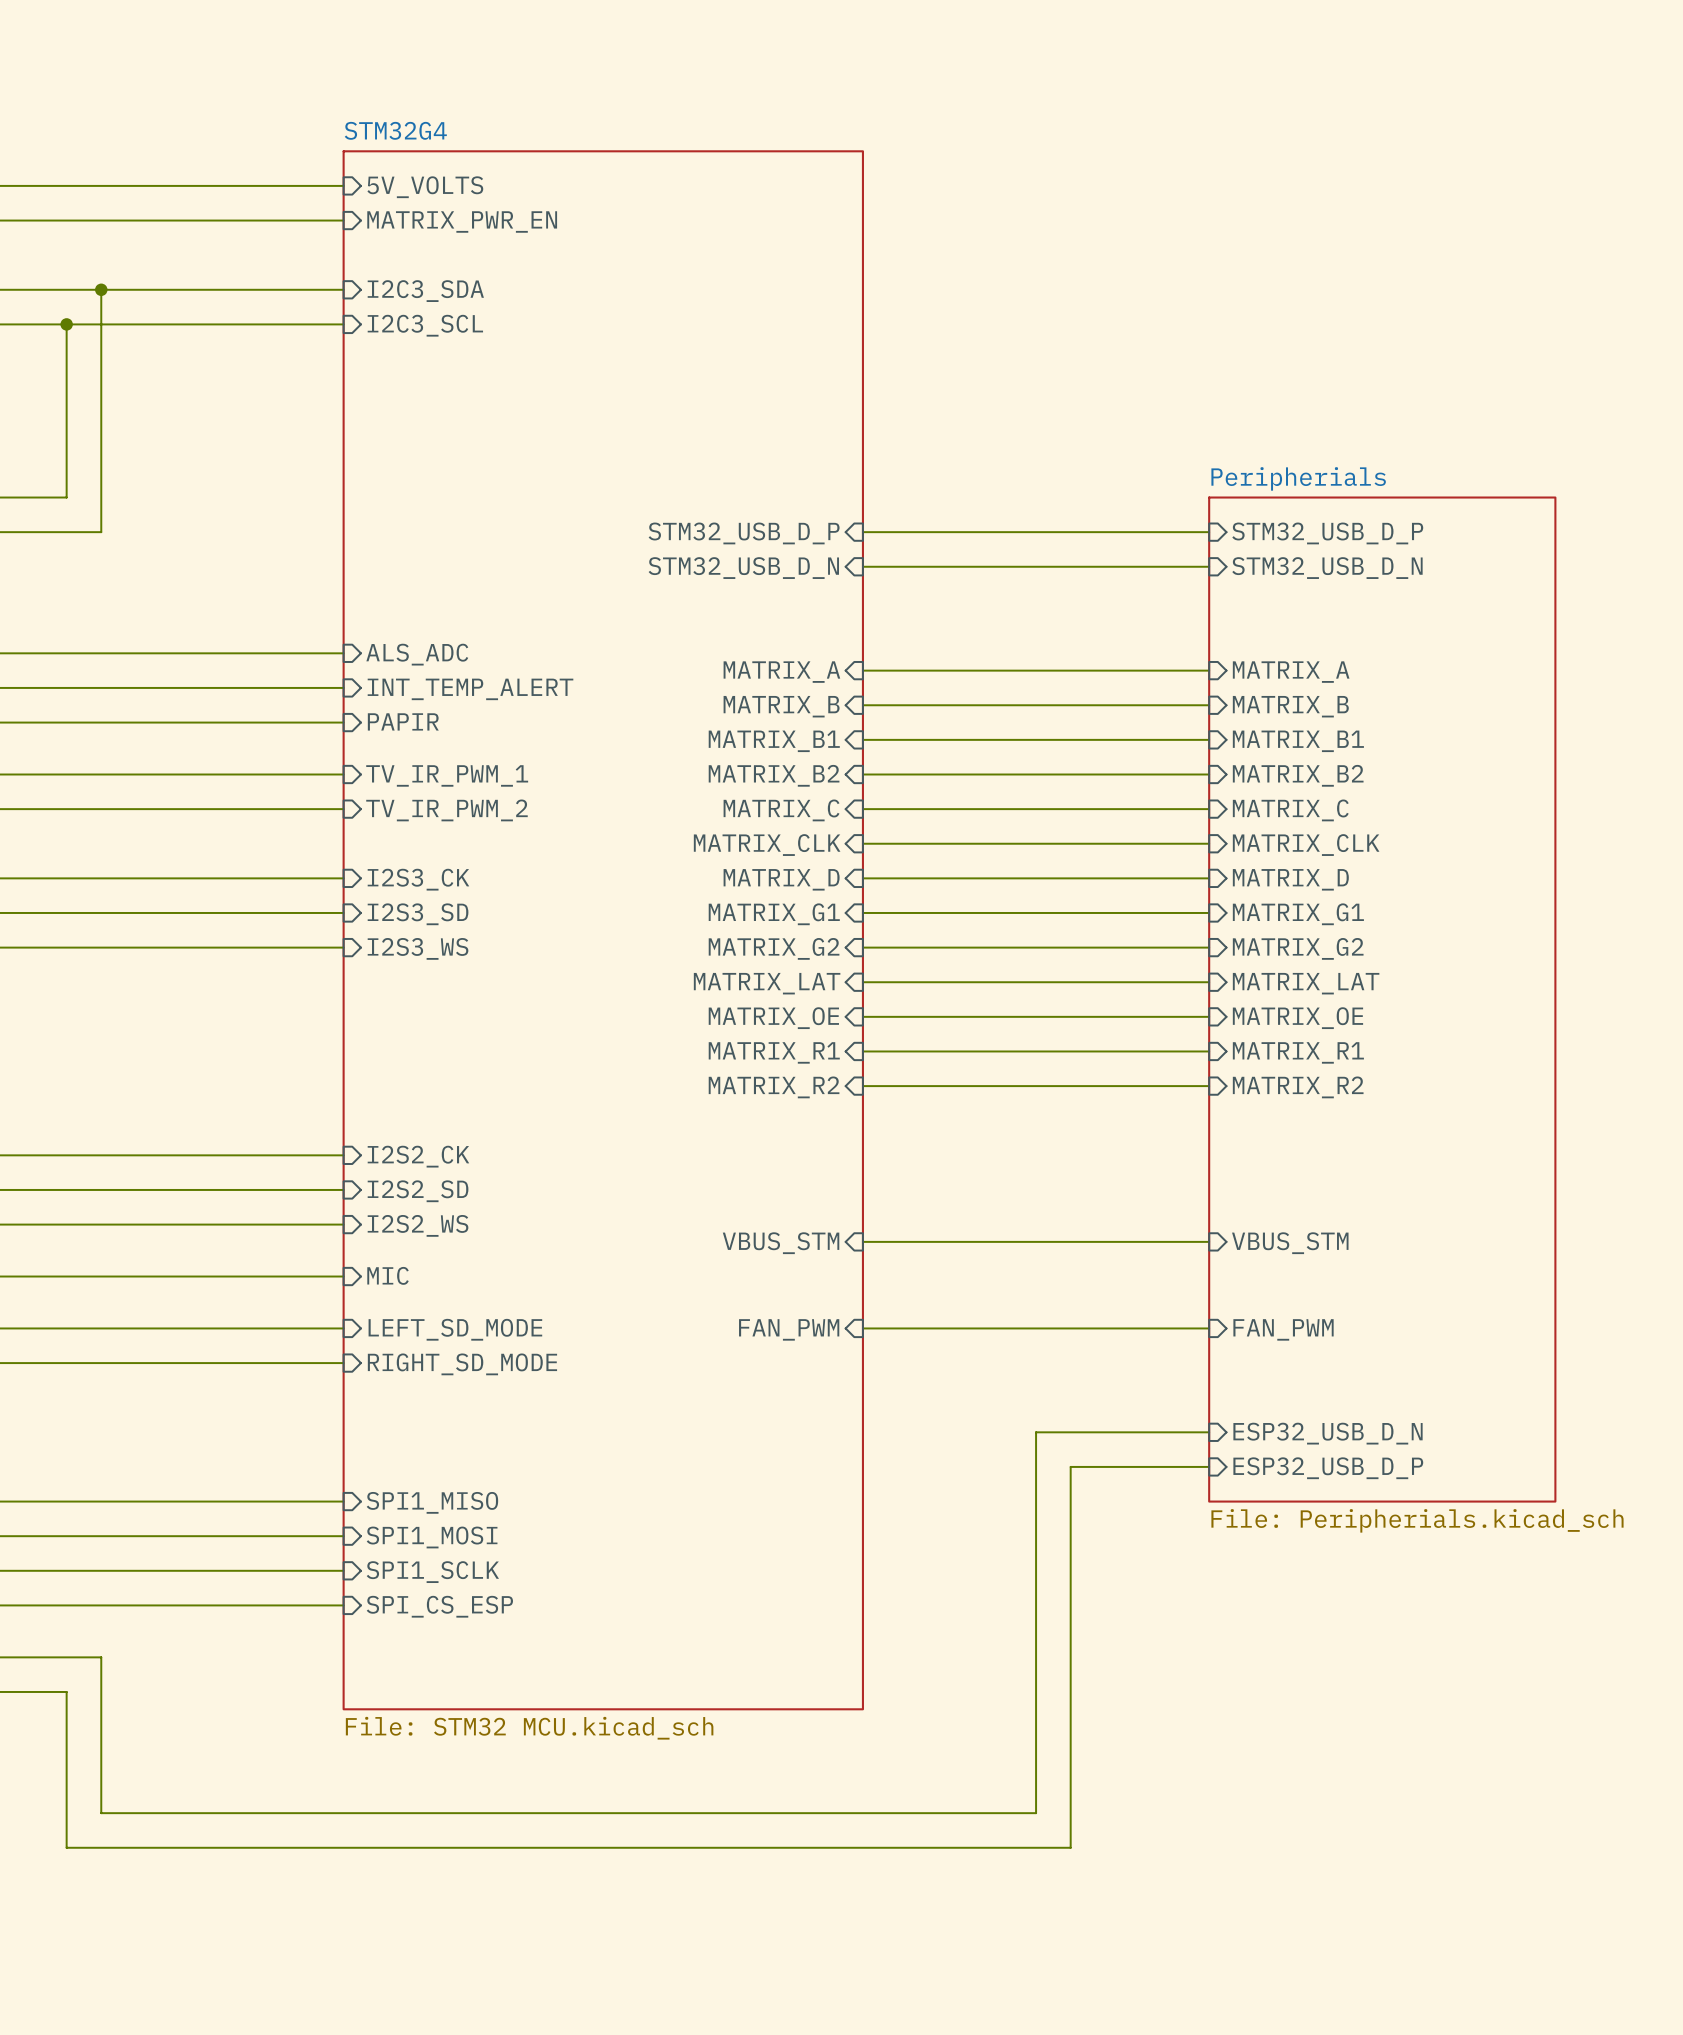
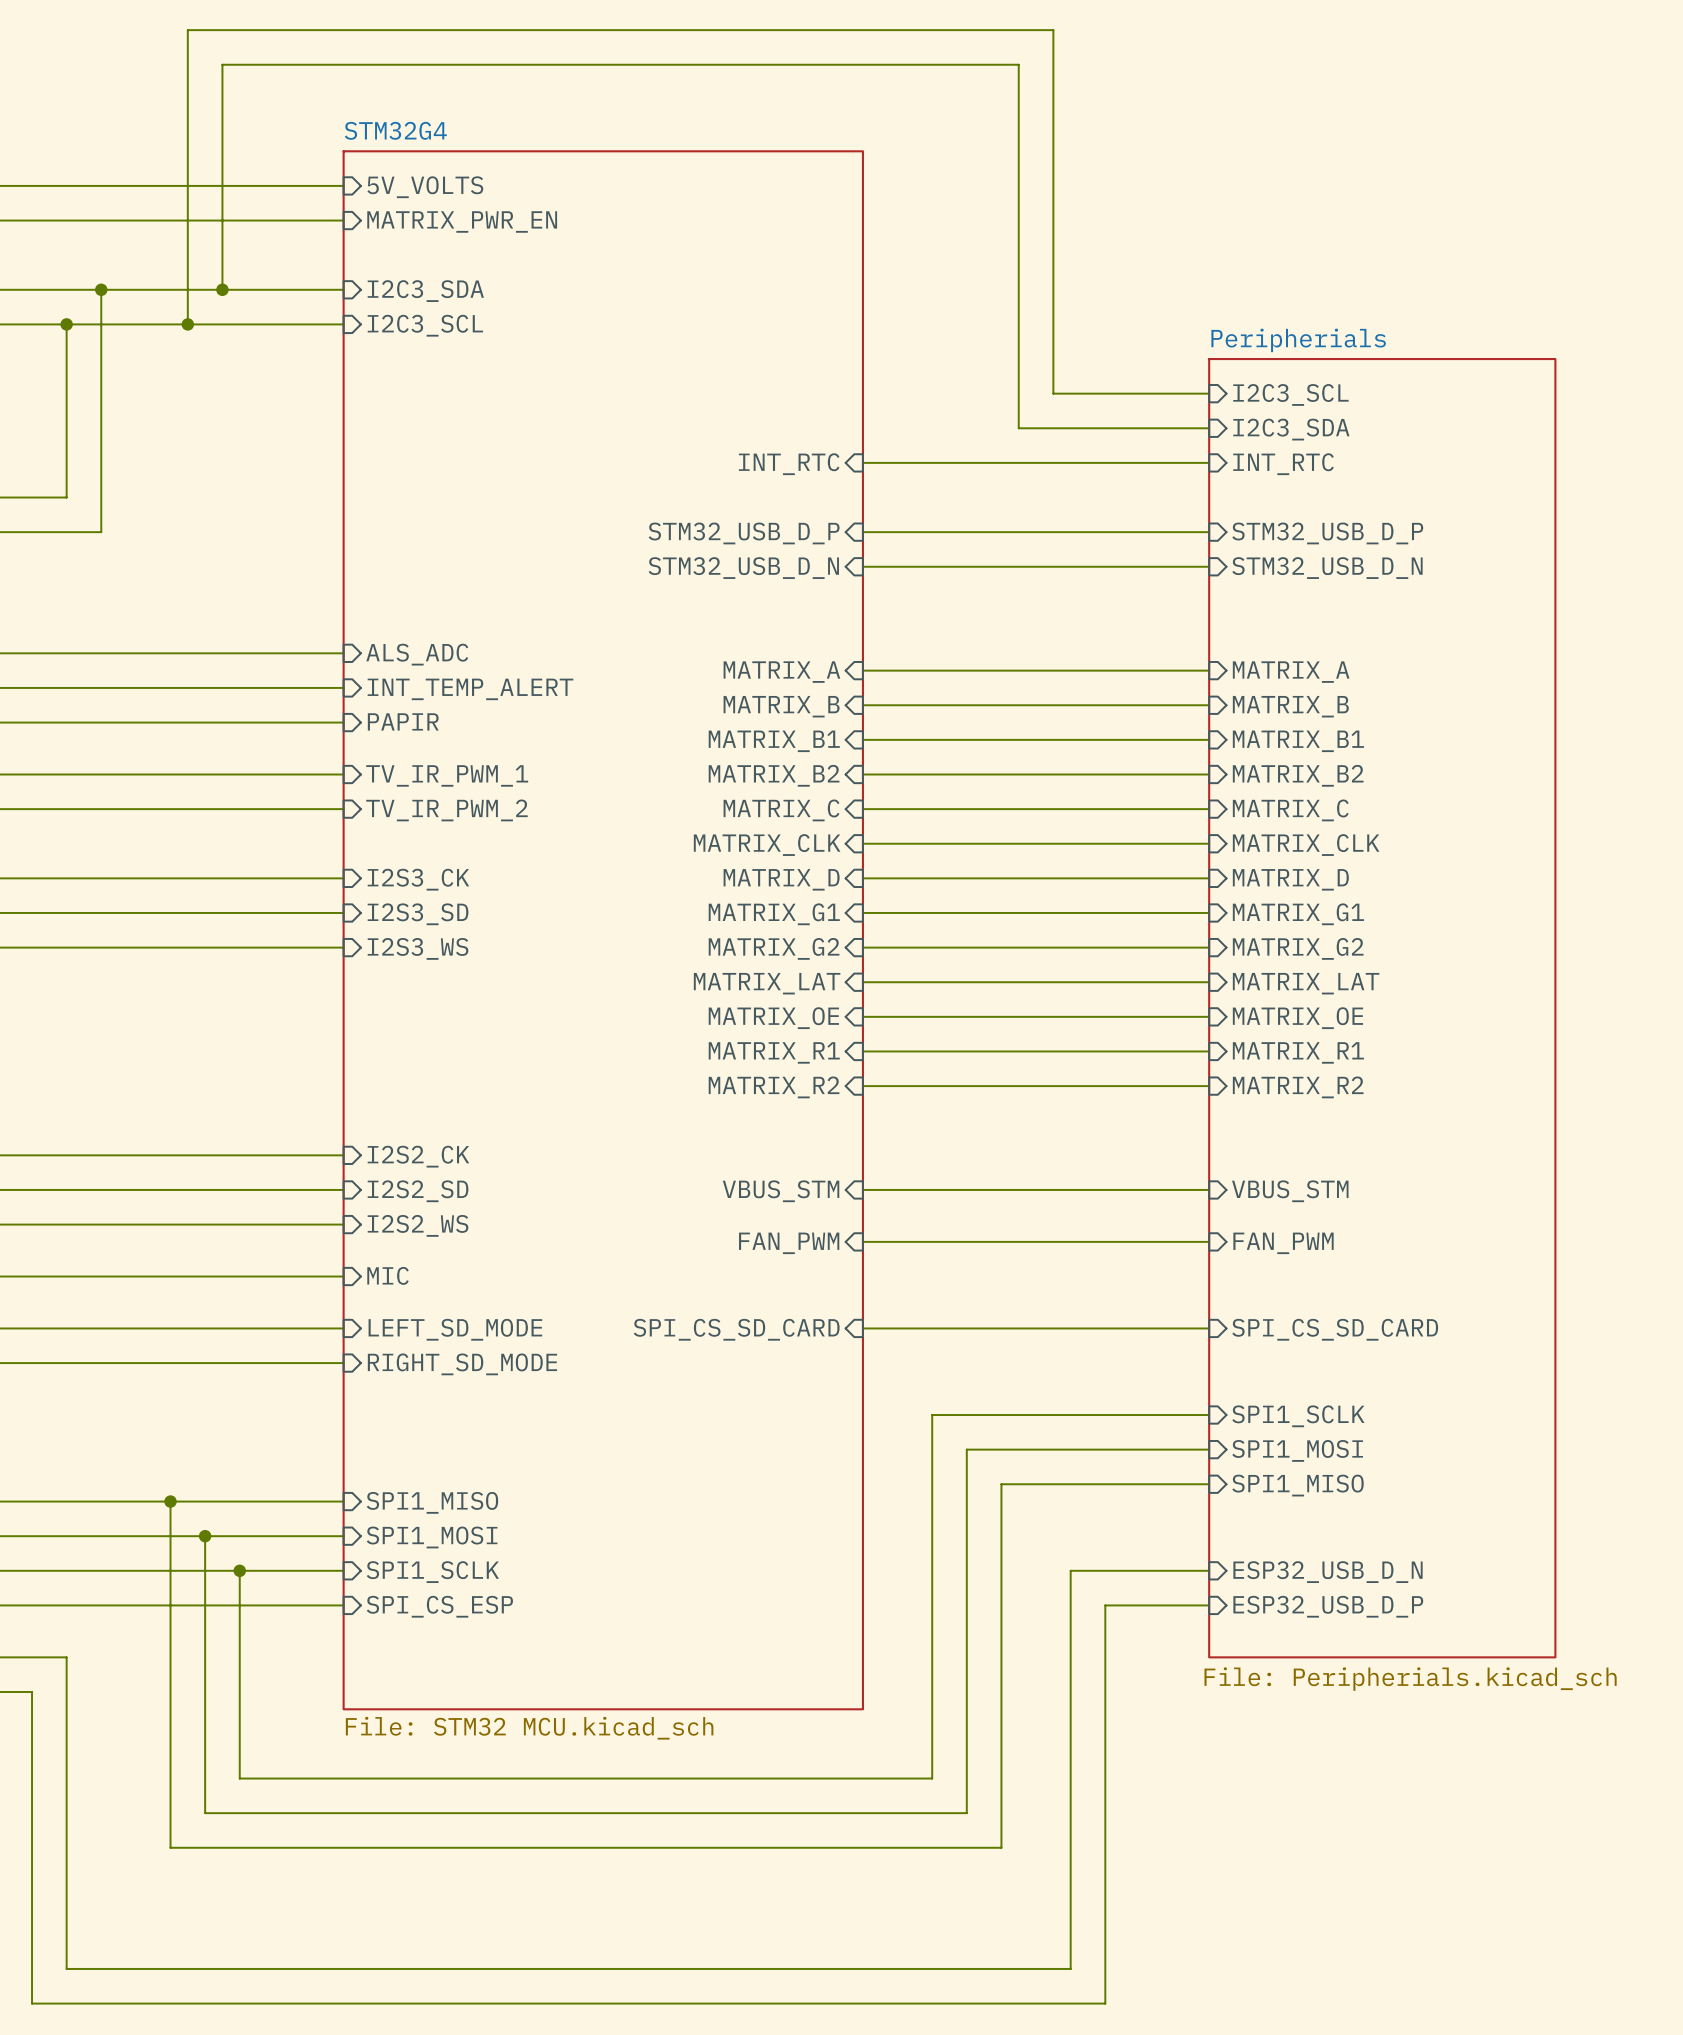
wire: none -> (222, 289) (222, 64) (1018, 64) (1018, 428) (1209, 428)
junction: none -> (222, 289)
wire: none -> (187, 324) (187, 30) (1053, 30) (1053, 393) (1209, 393)
junction: none -> (187, 324)
sheet pin: none -> I2C3_SCL (1290, 394)
sheet pin: none -> I2C3_SDA (1291, 429)
wire: none -> (862, 462) (1209, 462)
sheet pin: none -> INT_RTC (789, 464)
sheet pin: none -> INT_RTC (1283, 464)
sheet Peripherials name position: Peripherials (1298, 478) -> Peripherials (1298, 340)
sheet Peripherials shape: [1208, 496, 1557, 1503] -> [1208, 357, 1557, 1659]
wire: none -> (862, 1189) (1209, 1189)
sheet pin: none -> VBUS_STM (781, 1191)
sheet pin: none -> VBUS_STM (1290, 1191)
sheet pin: VBUS_STM (781, 1243) -> FAN_PWM (789, 1243)
sheet pin: VBUS_STM (1290, 1243) -> FAN_PWM (1283, 1243)
sheet pin: FAN_PWM (789, 1329) -> SPI_CS_SD_CARD (736, 1329)
sheet pin: FAN_PWM (1283, 1329) -> SPI_CS_SD_CARD (1335, 1329)
wire: none -> (1209, 1415) (932, 1415) (932, 1778) (239, 1778) (239, 1570)
sheet pin: none -> SPI1_SCLK (1298, 1416)
wire: (1209, 1432) (1036, 1432) (1036, 1813) (966, 1813) -> (1209, 1449) (966, 1449) (966, 1813)
sheet pin position: ESP32_USB_D_N (1328, 1433) -> ESP32_USB_D_N (1328, 1572)
sheet pin: none -> SPI1_MOSI (1297, 1450)
wire: (1209, 1466) (1070, 1466) (1070, 1570) -> (1209, 1570) (1070, 1570)
sheet pin position: ESP32_USB_D_P (1328, 1468) -> ESP32_USB_D_P (1328, 1606)
sheet pin: none -> SPI1_MISO (1297, 1485)
junction: none -> (170, 1501)
sheet Peripherials value position: File: Peripherials.kicad_sch (1417, 1520) -> File: Peripherials.kicad_sch (1410, 1679)
junction: none -> (205, 1536)
junction: none -> (239, 1570)
wire: none -> (1209, 1605) (1105, 1605) (1105, 2003) (32, 2003) (32, 1691)
wire: (66, 1657) (101, 1657) (101, 1813) (205, 1813) -> (205, 1536) (205, 1813)
wire: (32, 1691) (66, 1691) -> (66, 1657) (66, 1691)
wire: (66, 1847) (170, 1847) -> (170, 1501) (170, 1847)
wire: none -> (66, 1847) (66, 1968) (1070, 1968) (1070, 1847)
wire: (1001, 1847) (1070, 1847) -> (1001, 1847) (1001, 1484) (1209, 1484)

